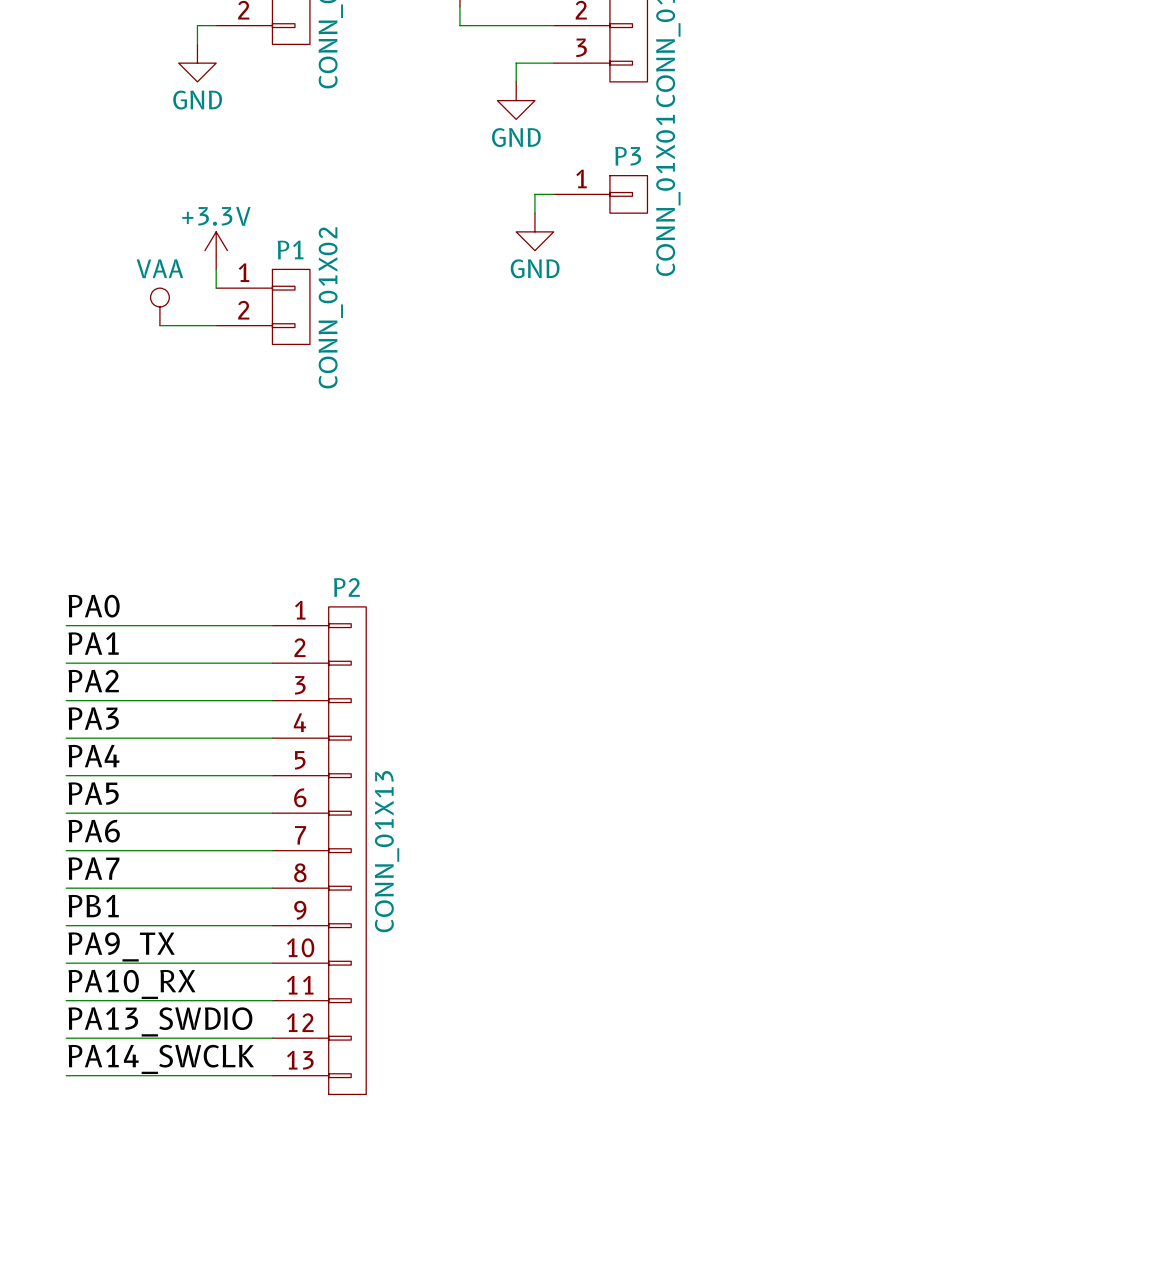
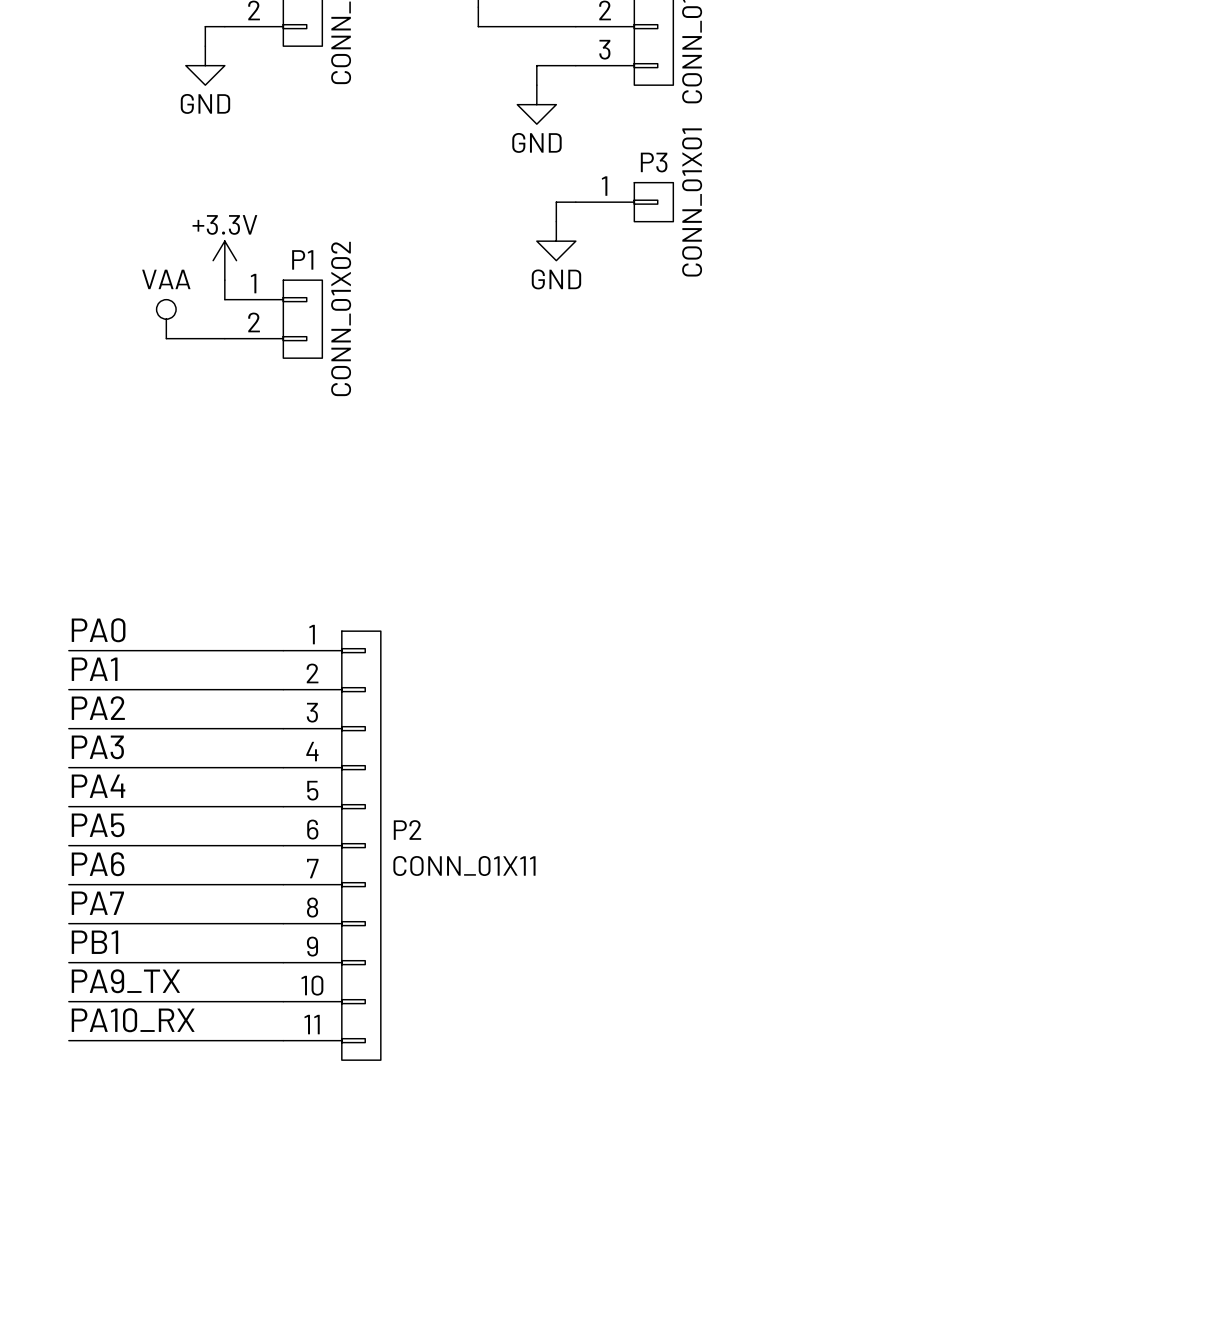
P2 name position: P2 (346, 587) -> P2 (407, 829)
P2 symbol: [272, 606, 367, 1095] -> [283, 631, 381, 1061]
P2 value: CONN_01X13 (387, 851) -> CONN_01X11 (464, 866)
label: PA13_SWDIO (160, 1021) -> none
wire: (66, 1038) (272, 1038) -> none
label: PA14_SWCLK (161, 1059) -> none
wire: (66, 1075) (272, 1075) -> none

